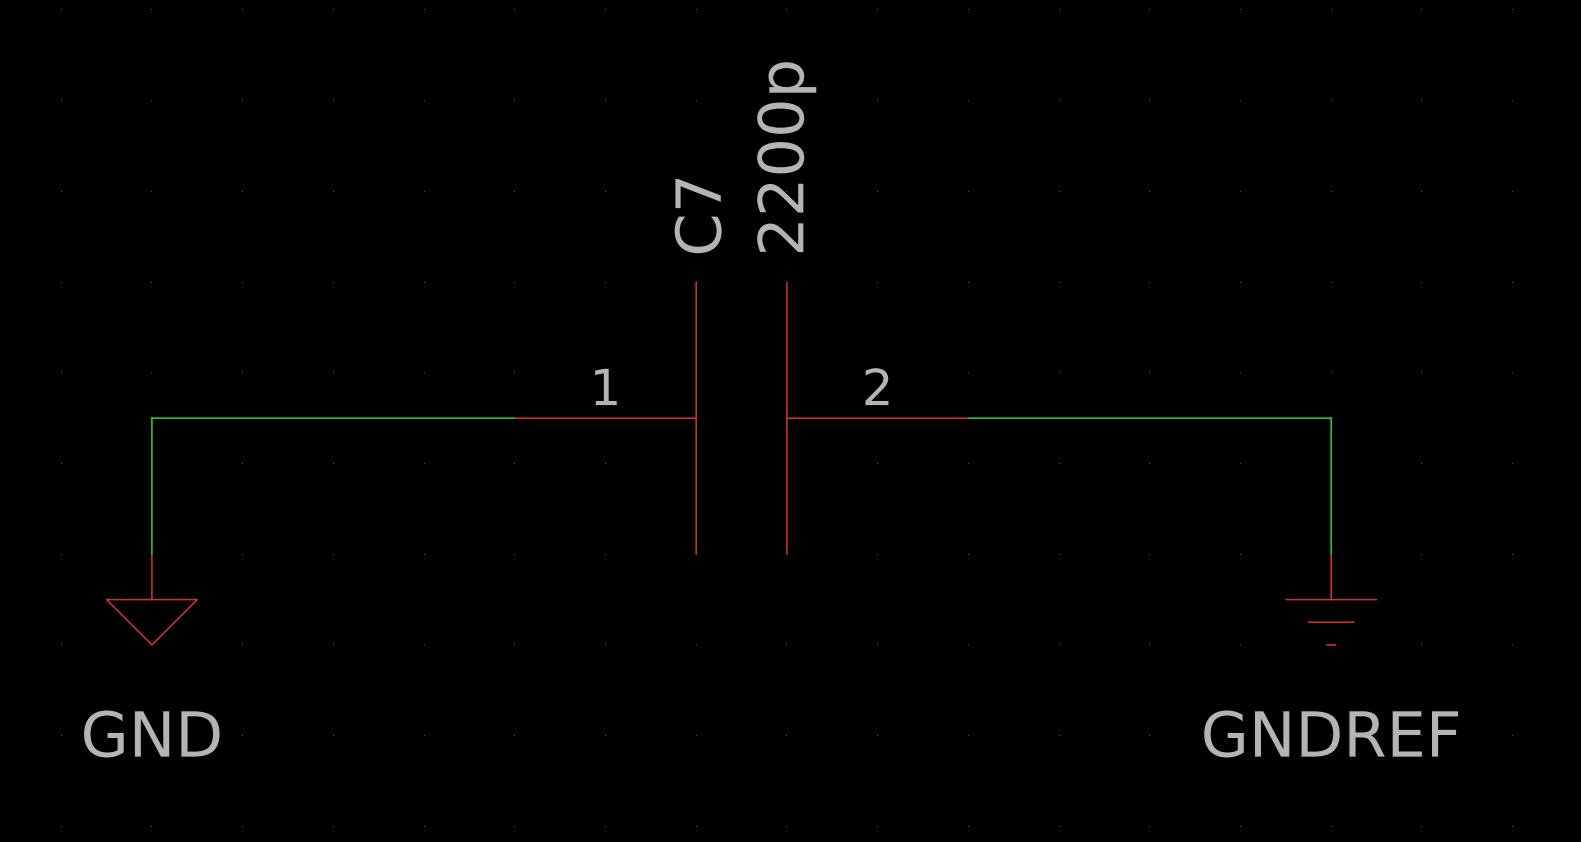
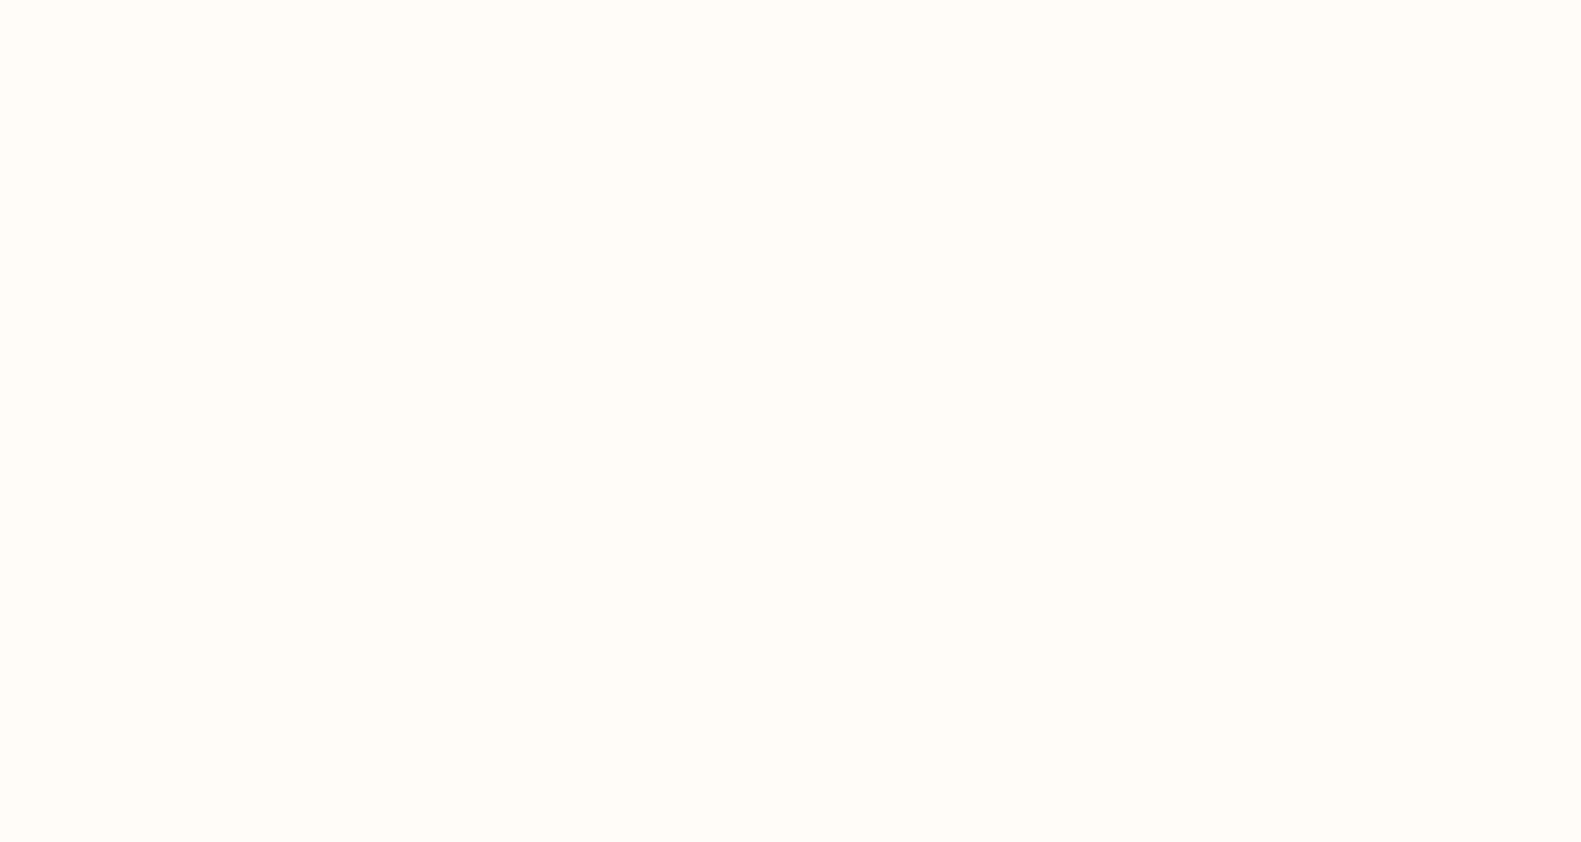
wire: (514, 418) (151, 418) (151, 554) -> none
C7: 2200p (741, 418) -> none
wire: (968, 418) (1331, 418) (1331, 554) -> none
power symbol: GND (151, 599) -> none
power symbol: GNDREF (1331, 599) -> none

